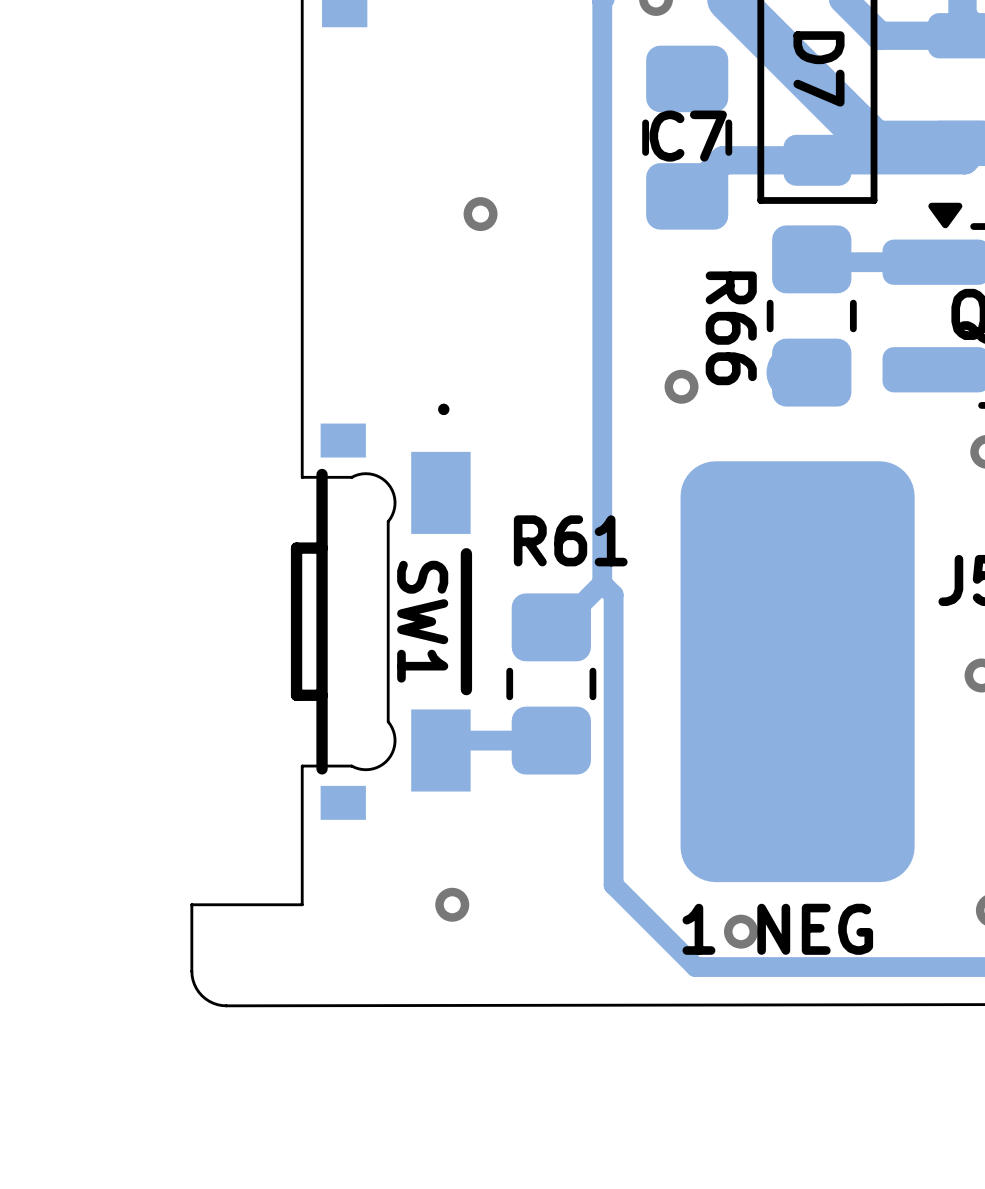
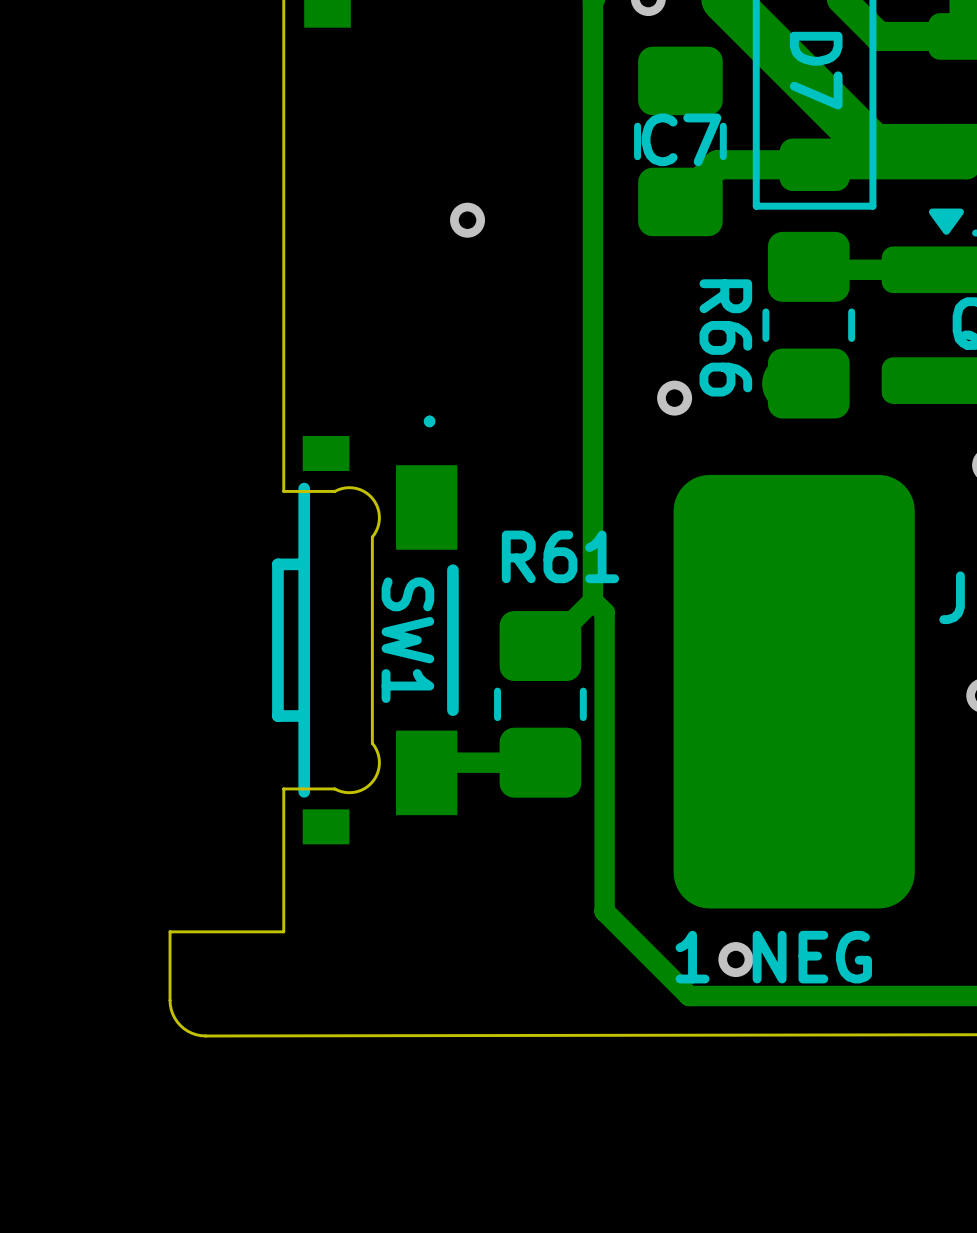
via: (452, 904) -> none

